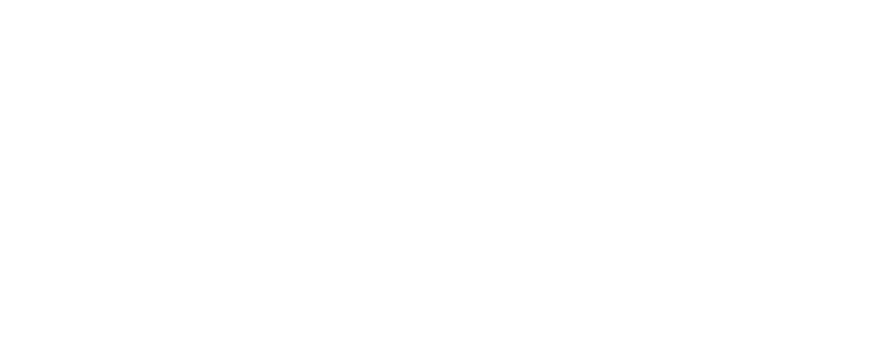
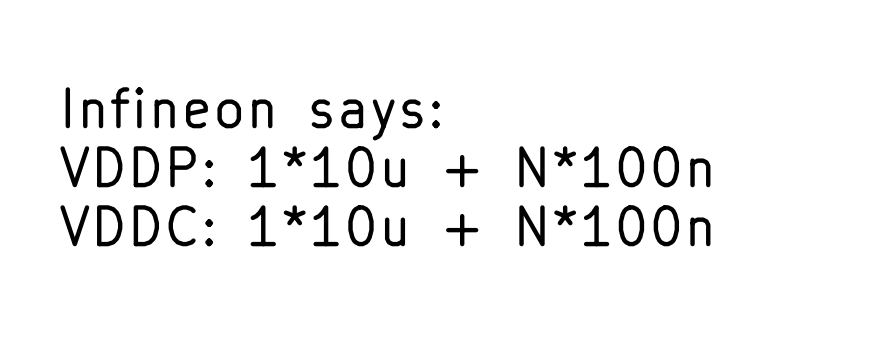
text: none -> Infineon says: (252, 113)
text: none -> VDDP: 1*10u + N*100n (385, 166)
text: none -> VDDC: 1*10u + N*100n (385, 225)

